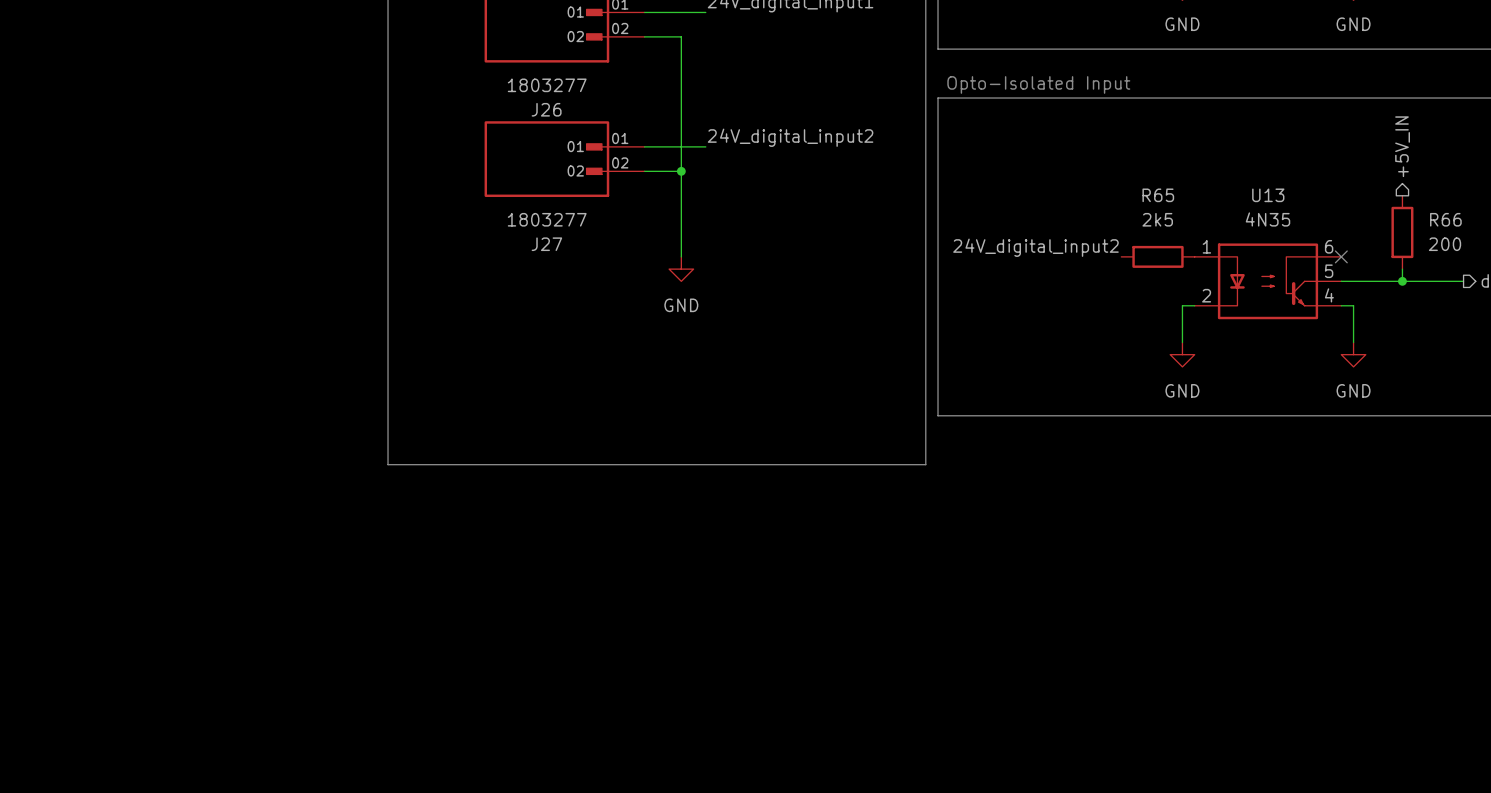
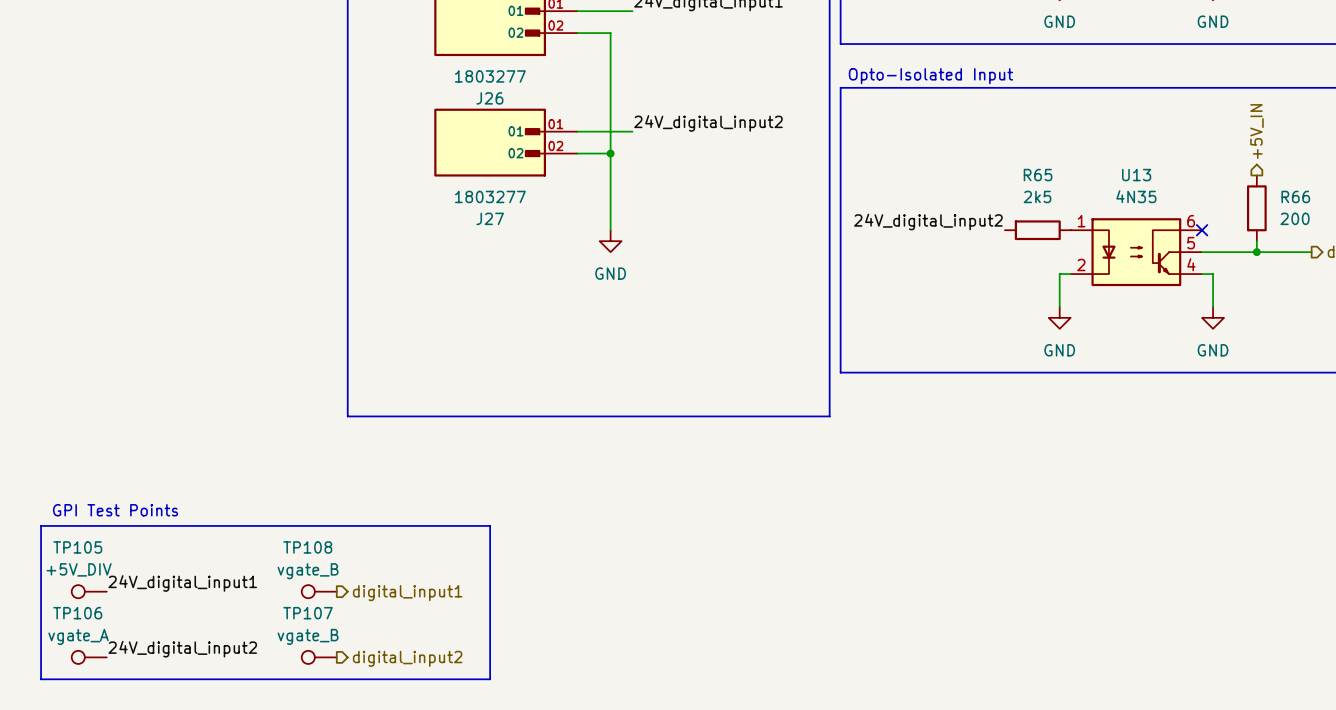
text: none -> GPI Test Points (115, 510)
line: none -> (41, 525) (490, 525) (490, 679) (41, 679) (41, 525)
label: none -> 24V_digital_input1 (182, 583)
TP105: none -> +5V_DIV (89, 591)
TP108: none -> vgate_B (319, 591)
hierarchical label: none -> digital_input1 (407, 593)
label: none -> 24V_digital_input2 (182, 649)
TP106: none -> vgate_A (89, 657)
TP107: none -> vgate_B (319, 657)
hierarchical label: none -> digital_input2 (407, 658)

